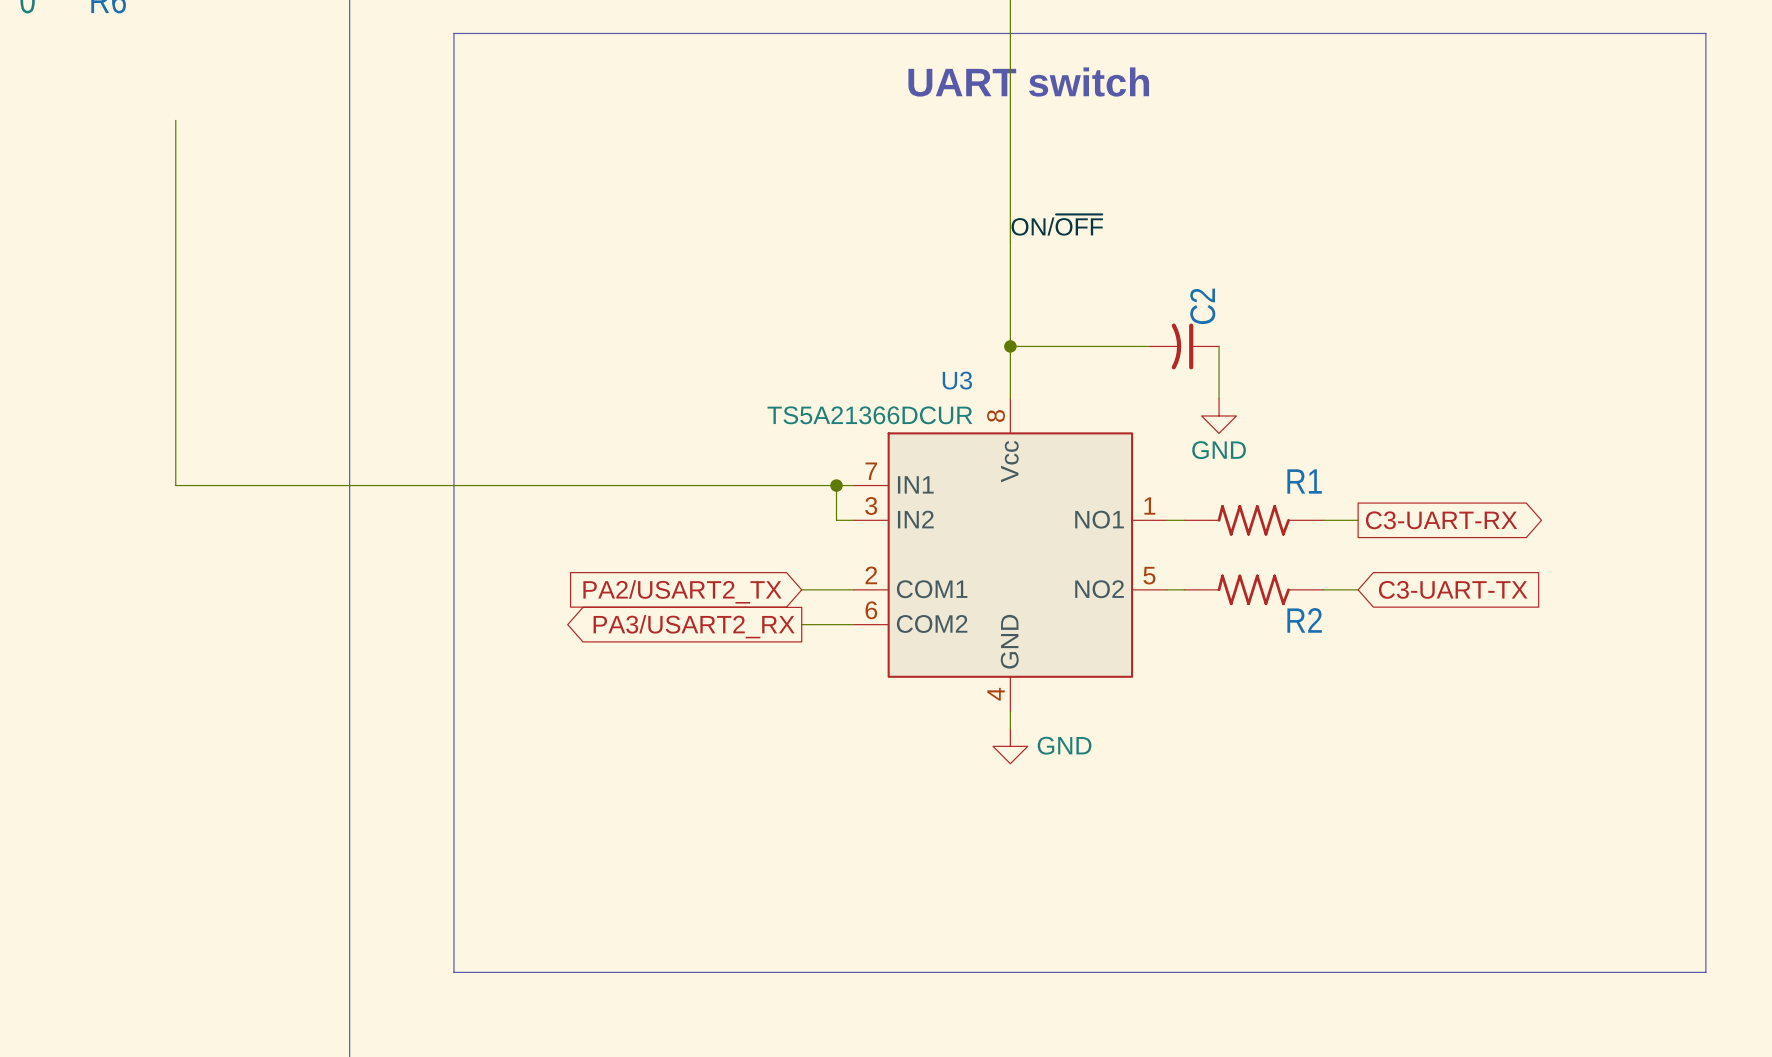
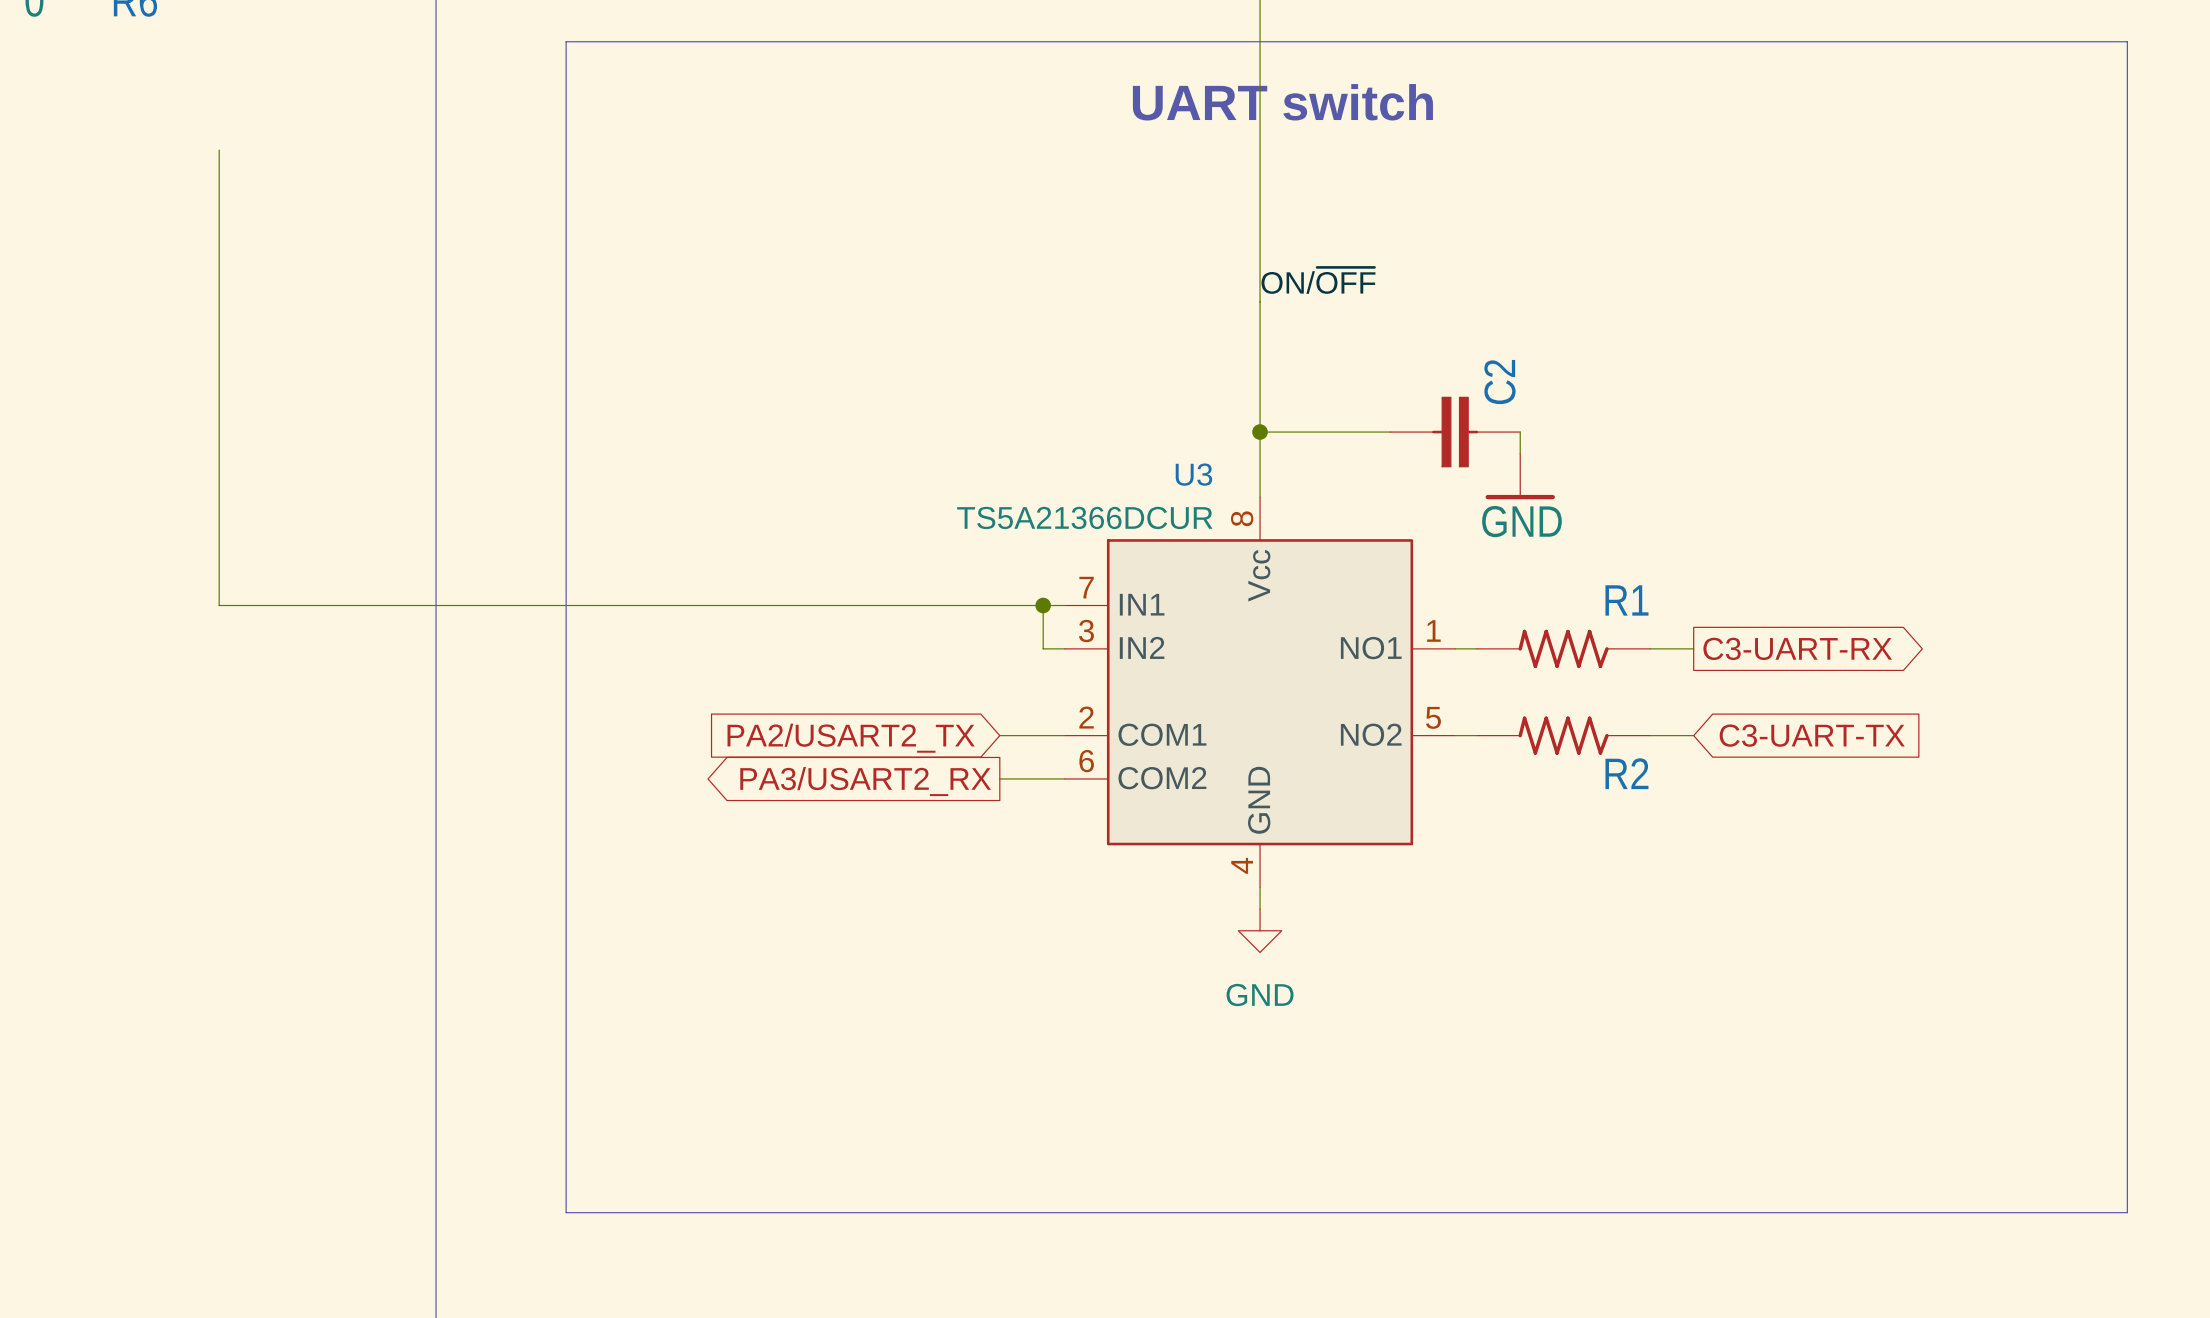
C2 symbol: [1149, 323, 1220, 370] -> [1390, 397, 1521, 467]
power symbol: none -> GND (1520, 476)
power symbol: GND (1219, 415) -> none
power symbol text position: GND (1064, 745) -> GND (1260, 995)

